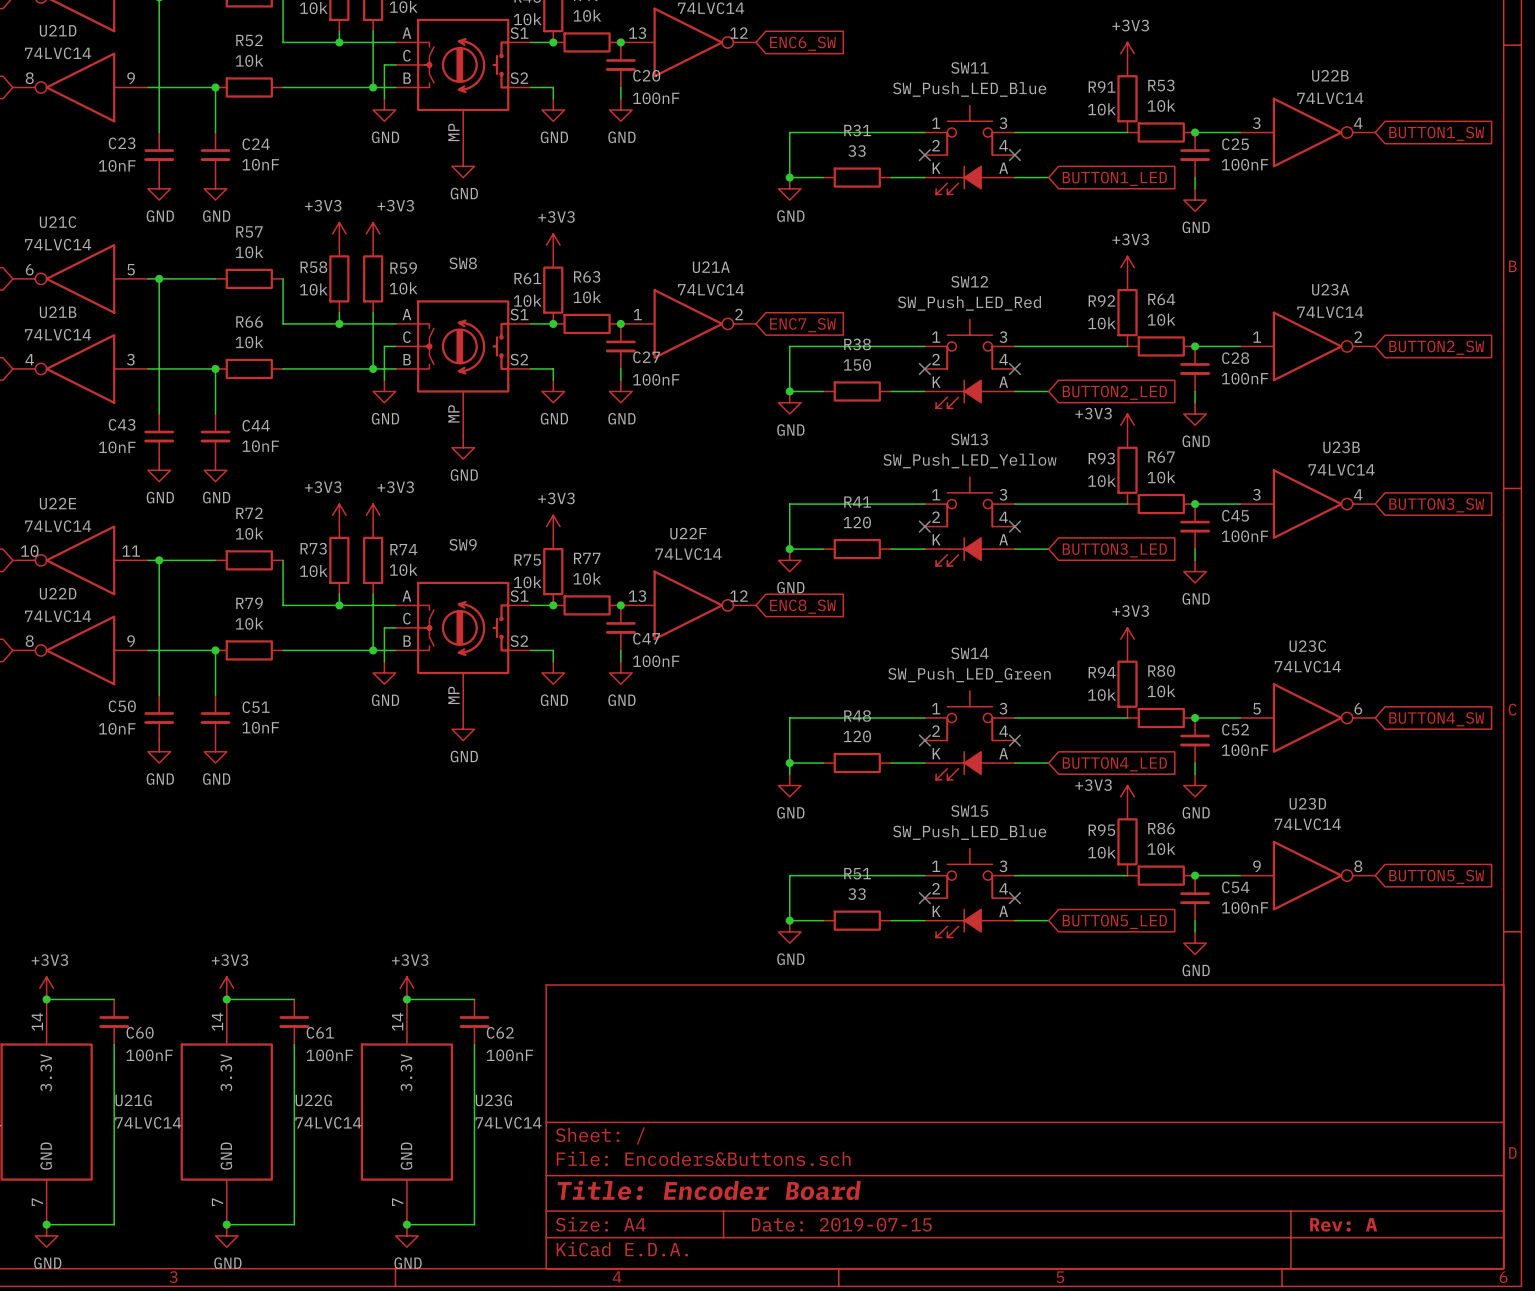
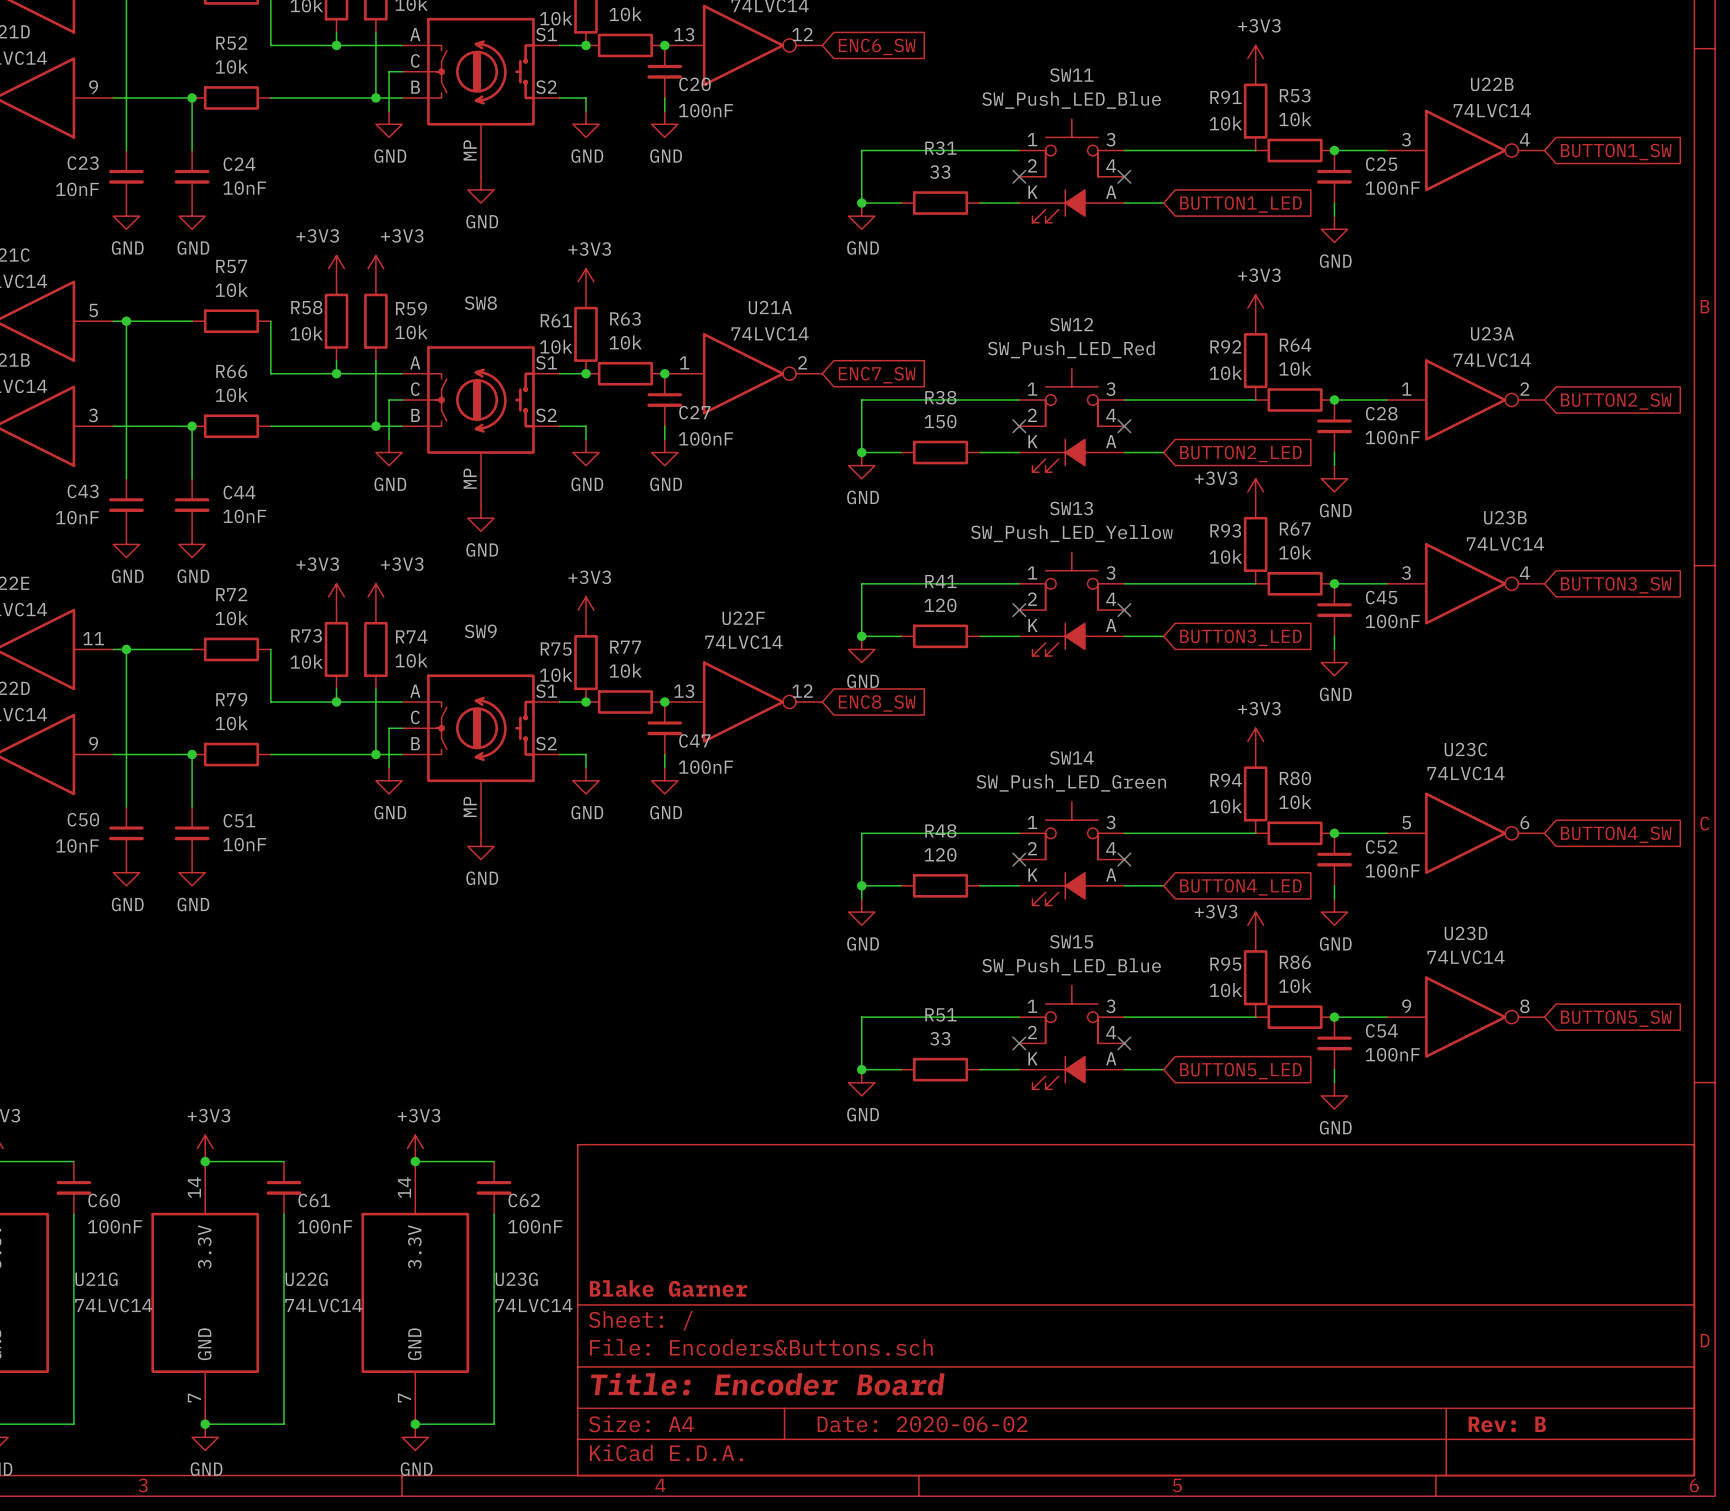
title block: none -> Blake Garner (668, 1288)
title block: Date: 2019-07-15 (841, 1224) -> Date: 2020-06-02 (922, 1424)
title block: Rev: A (1343, 1224) -> Rev: B (1507, 1424)

